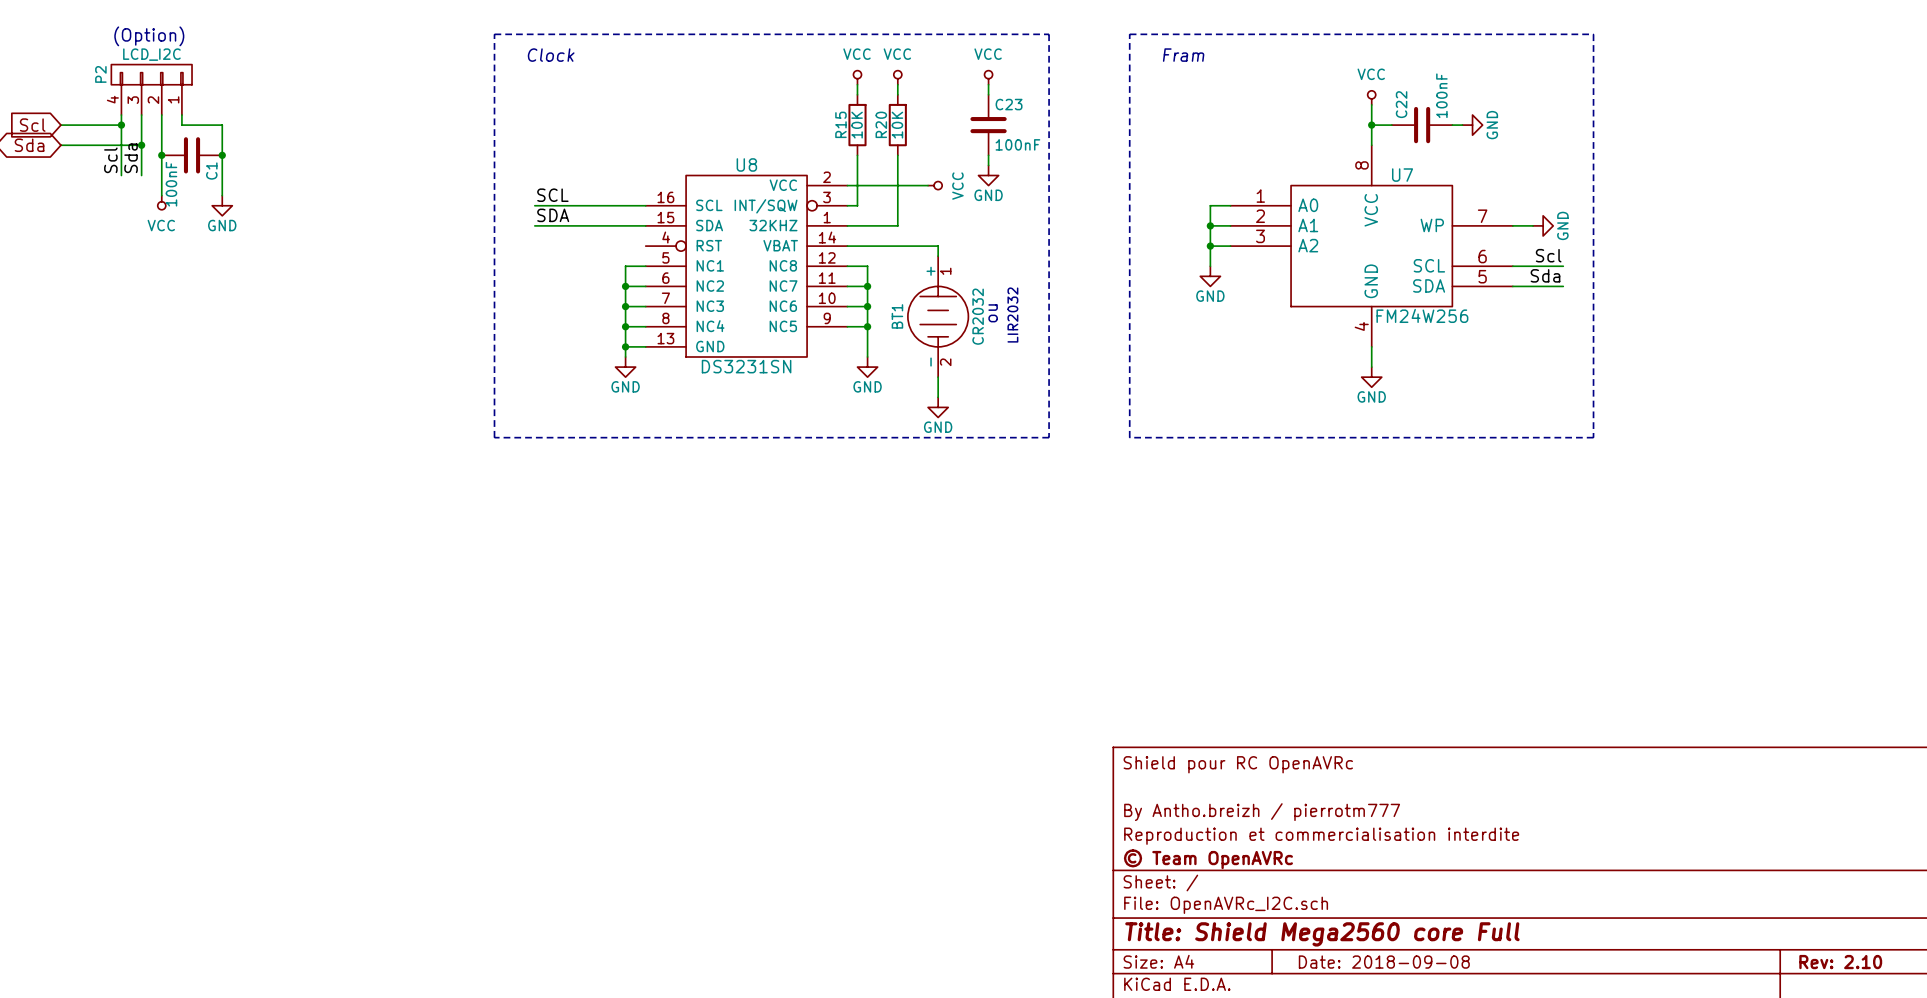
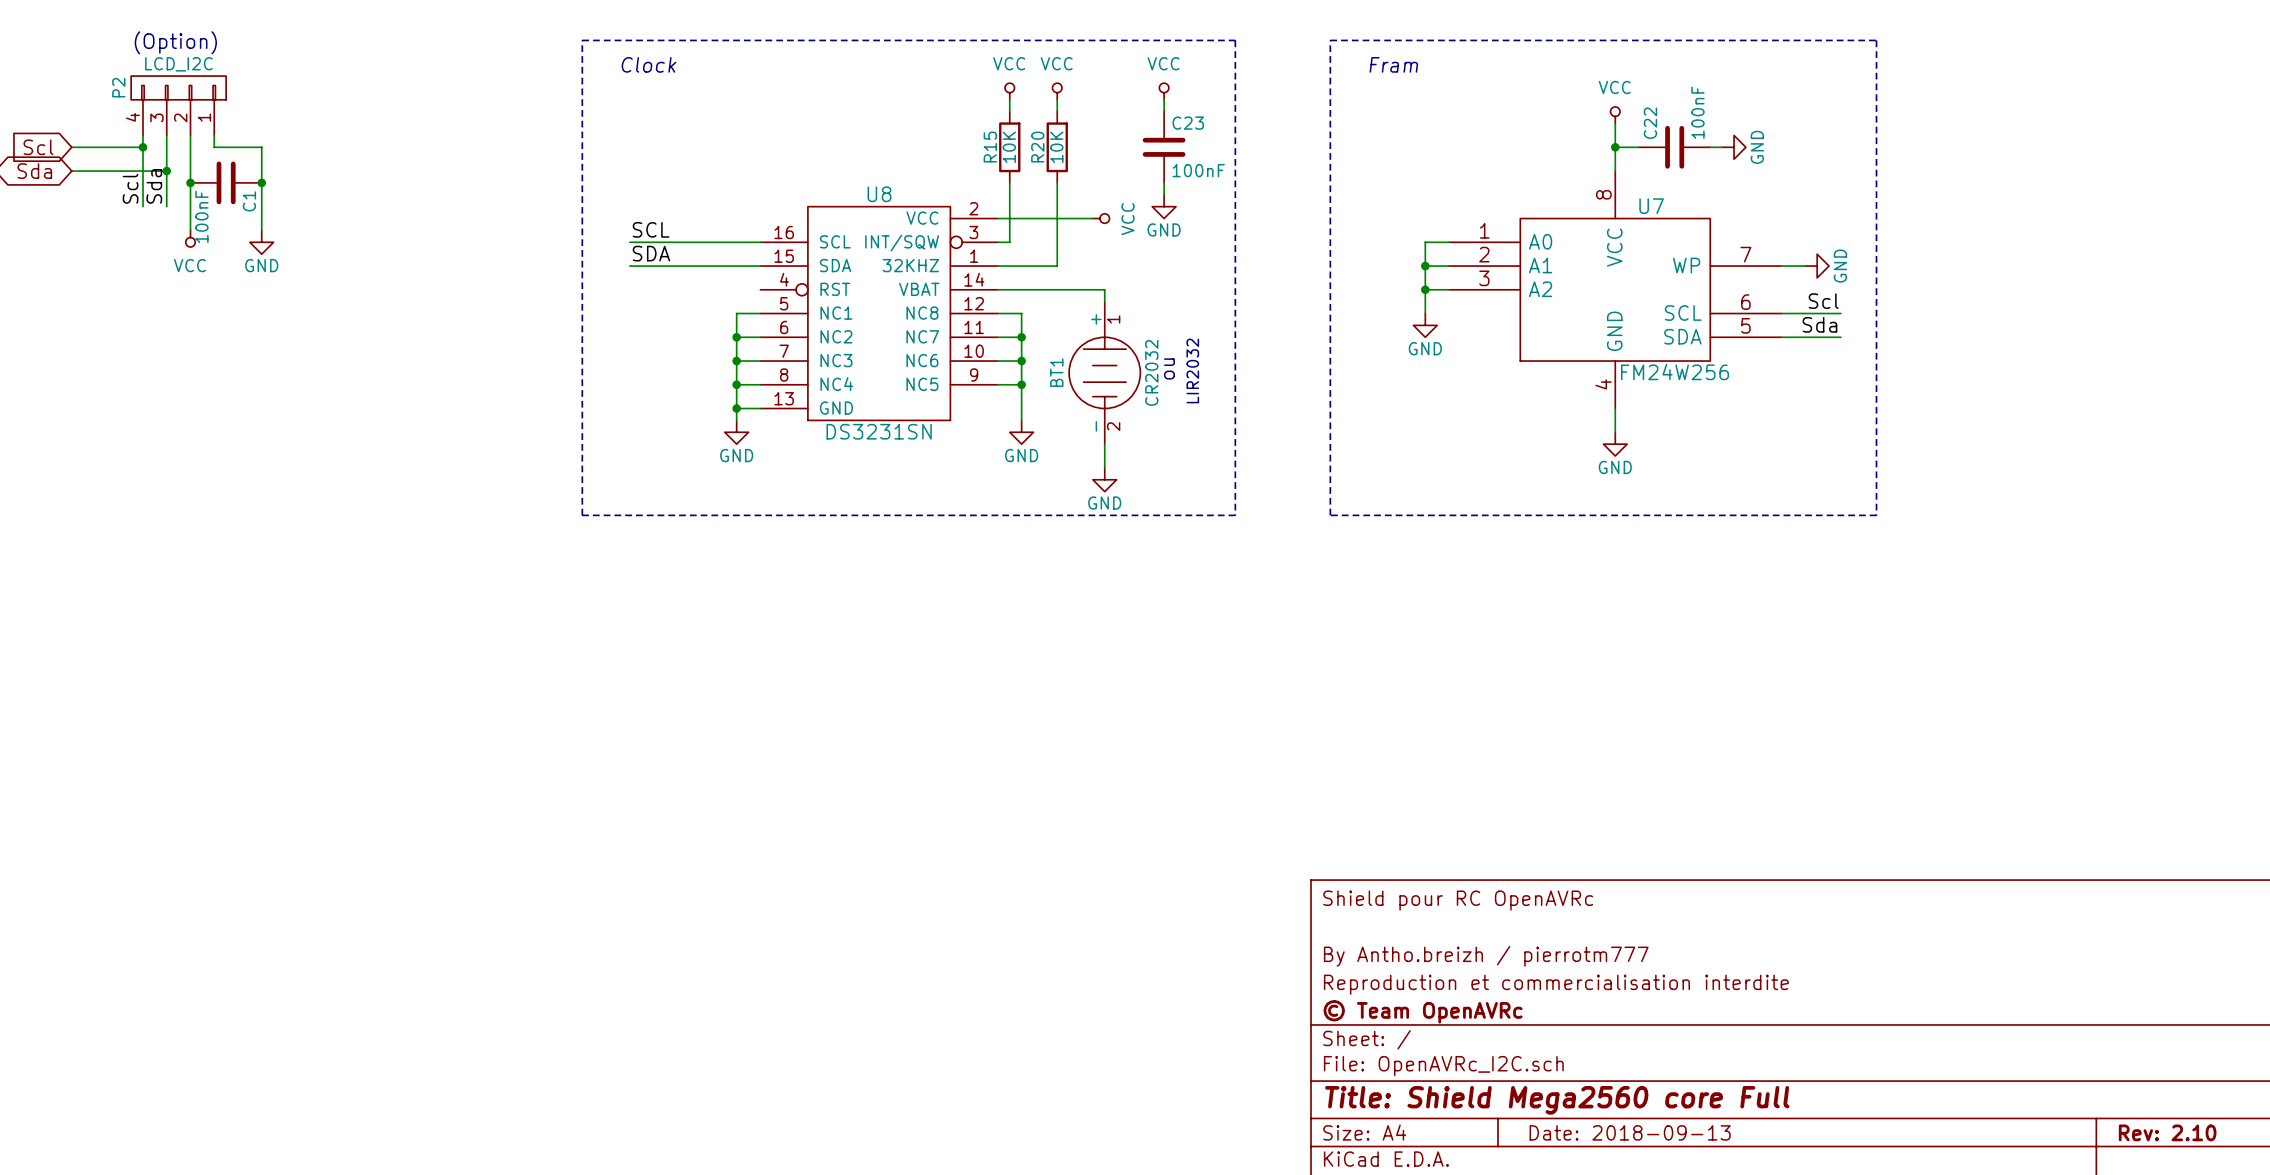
title block: Date: 2018-09-08 (1384, 962) -> Date: 2018-09-13 (1630, 1132)

